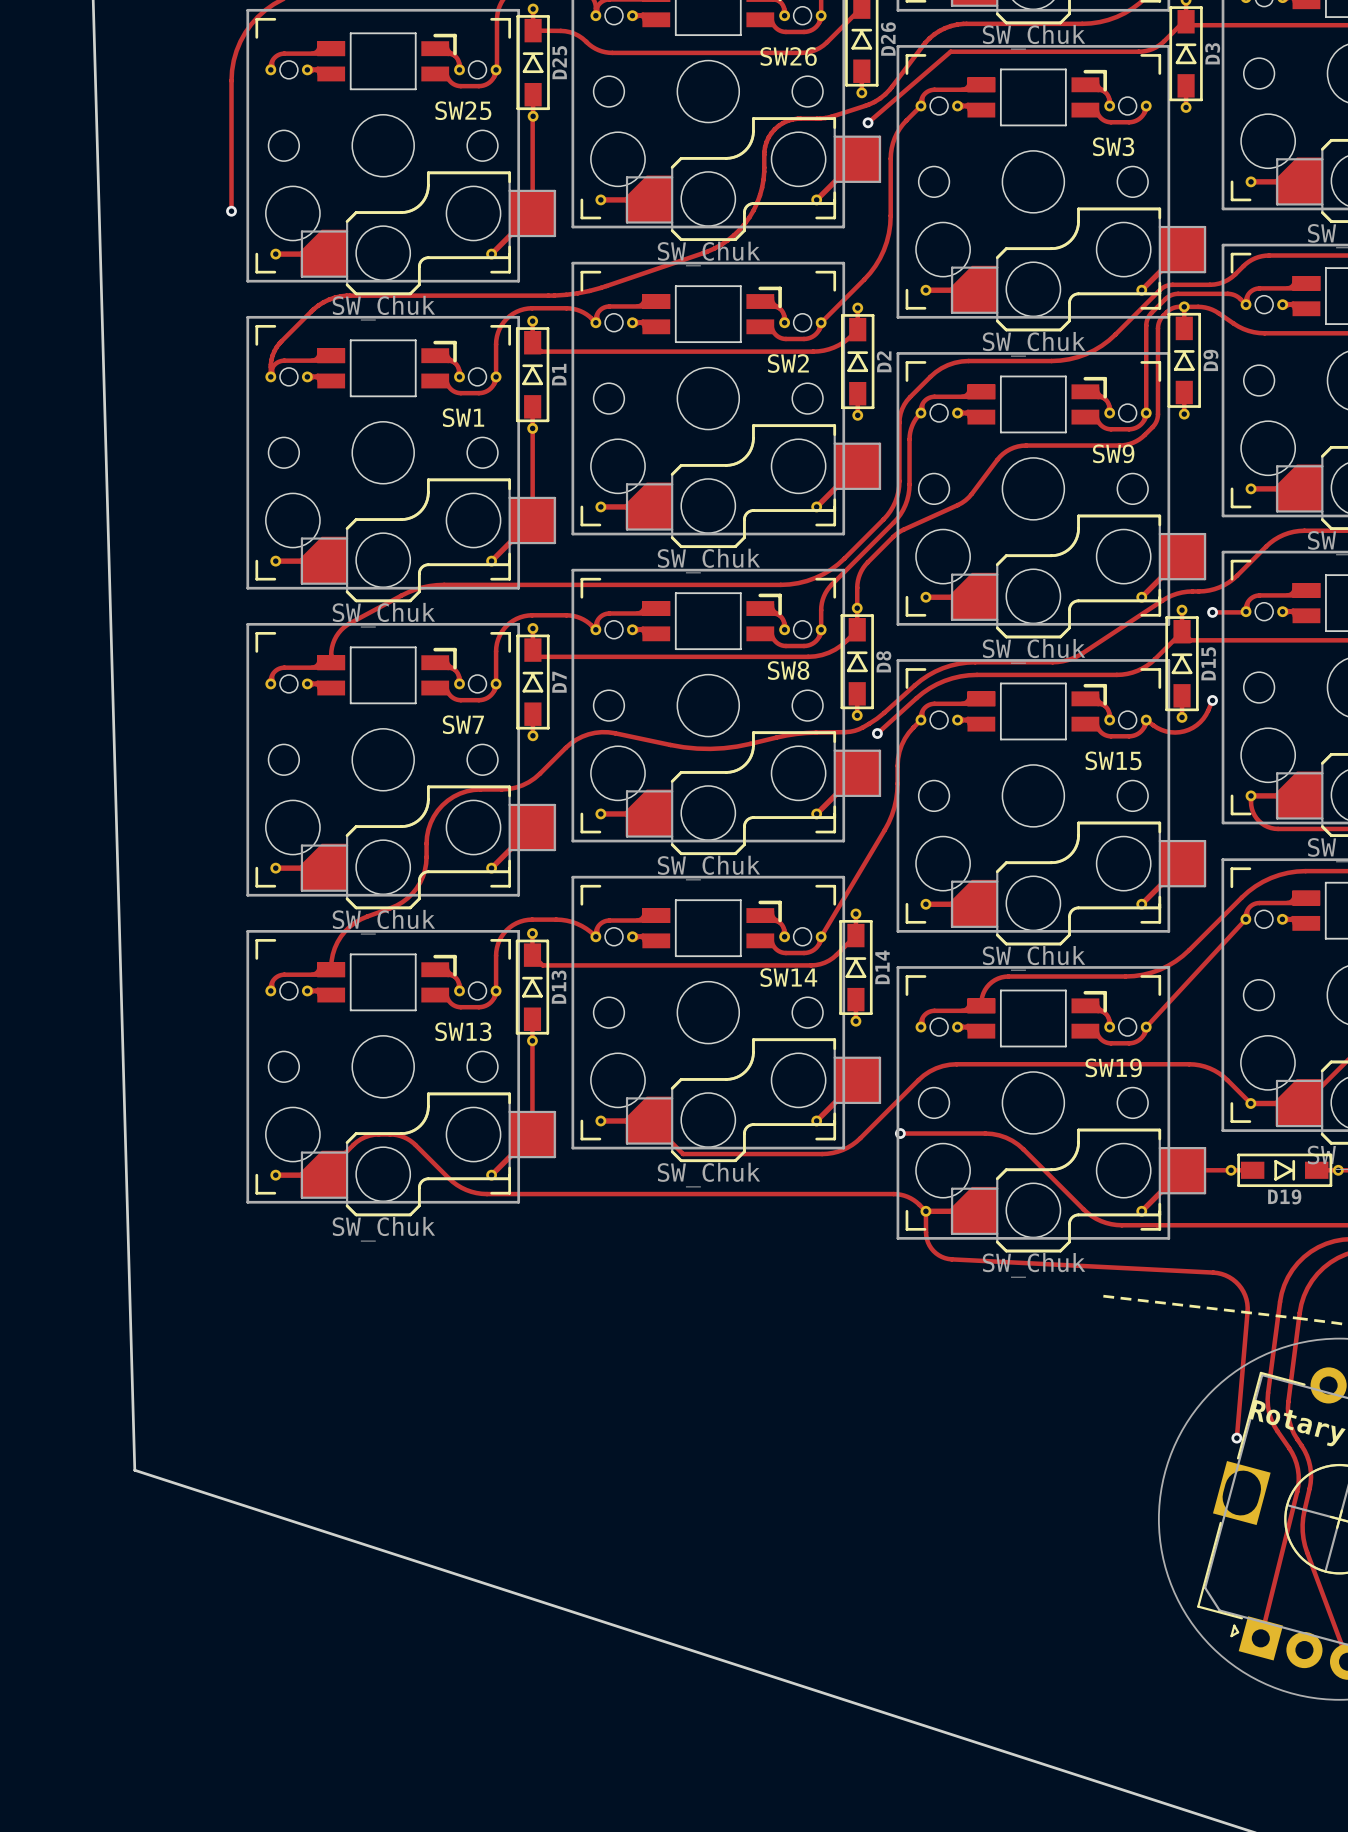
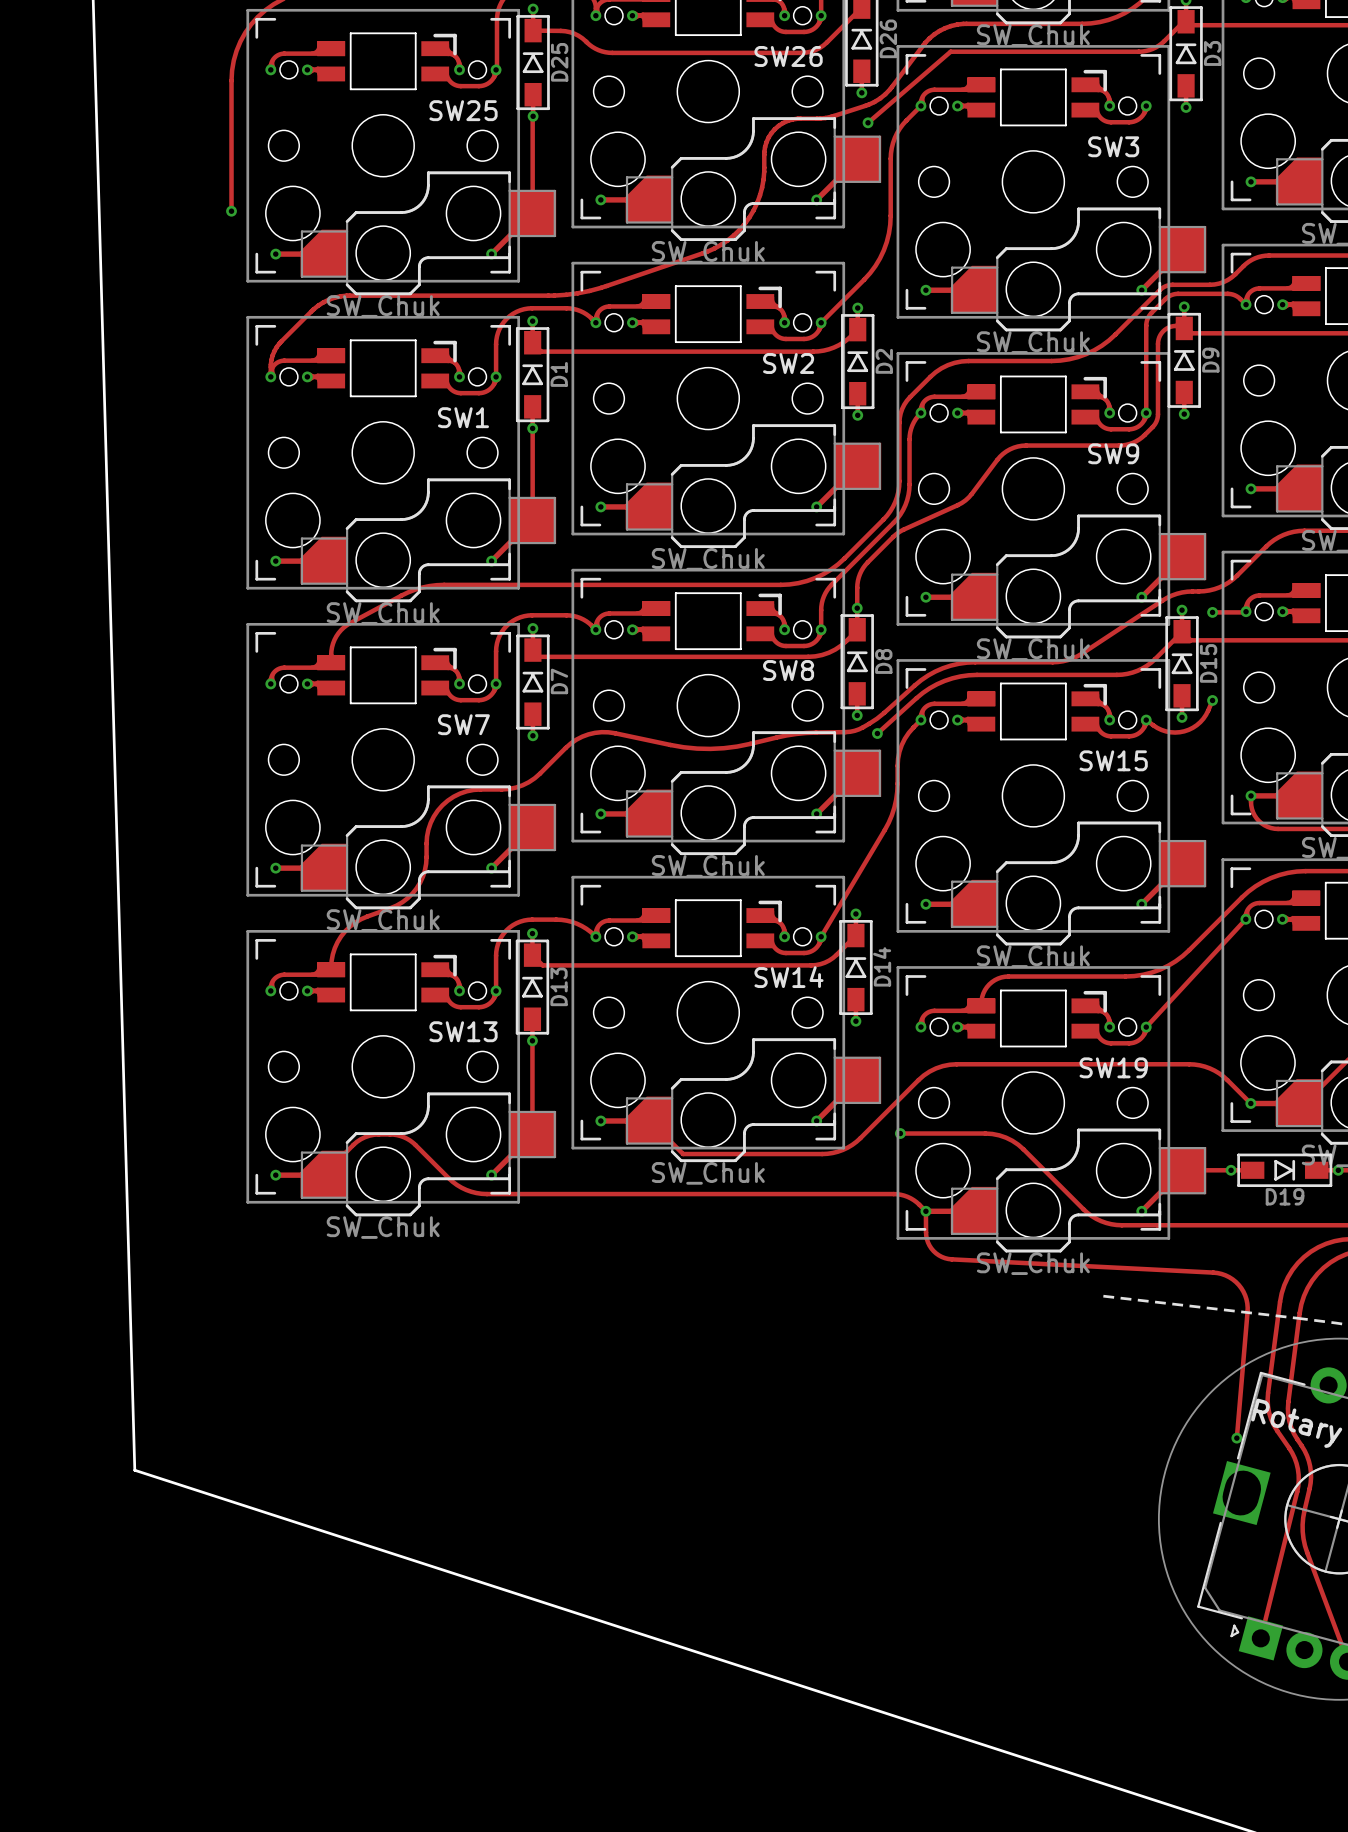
track: none -> (1183, 325) (1173, 326) (1164, 329) (1159, 337) (1157, 343)
track: (1264, 333) (1243, 329) (1208, 308) (1177, 306) (1169, 309) (1160, 319) (1157, 343) -> (1264, 333) (1191, 333) (1183, 325)

